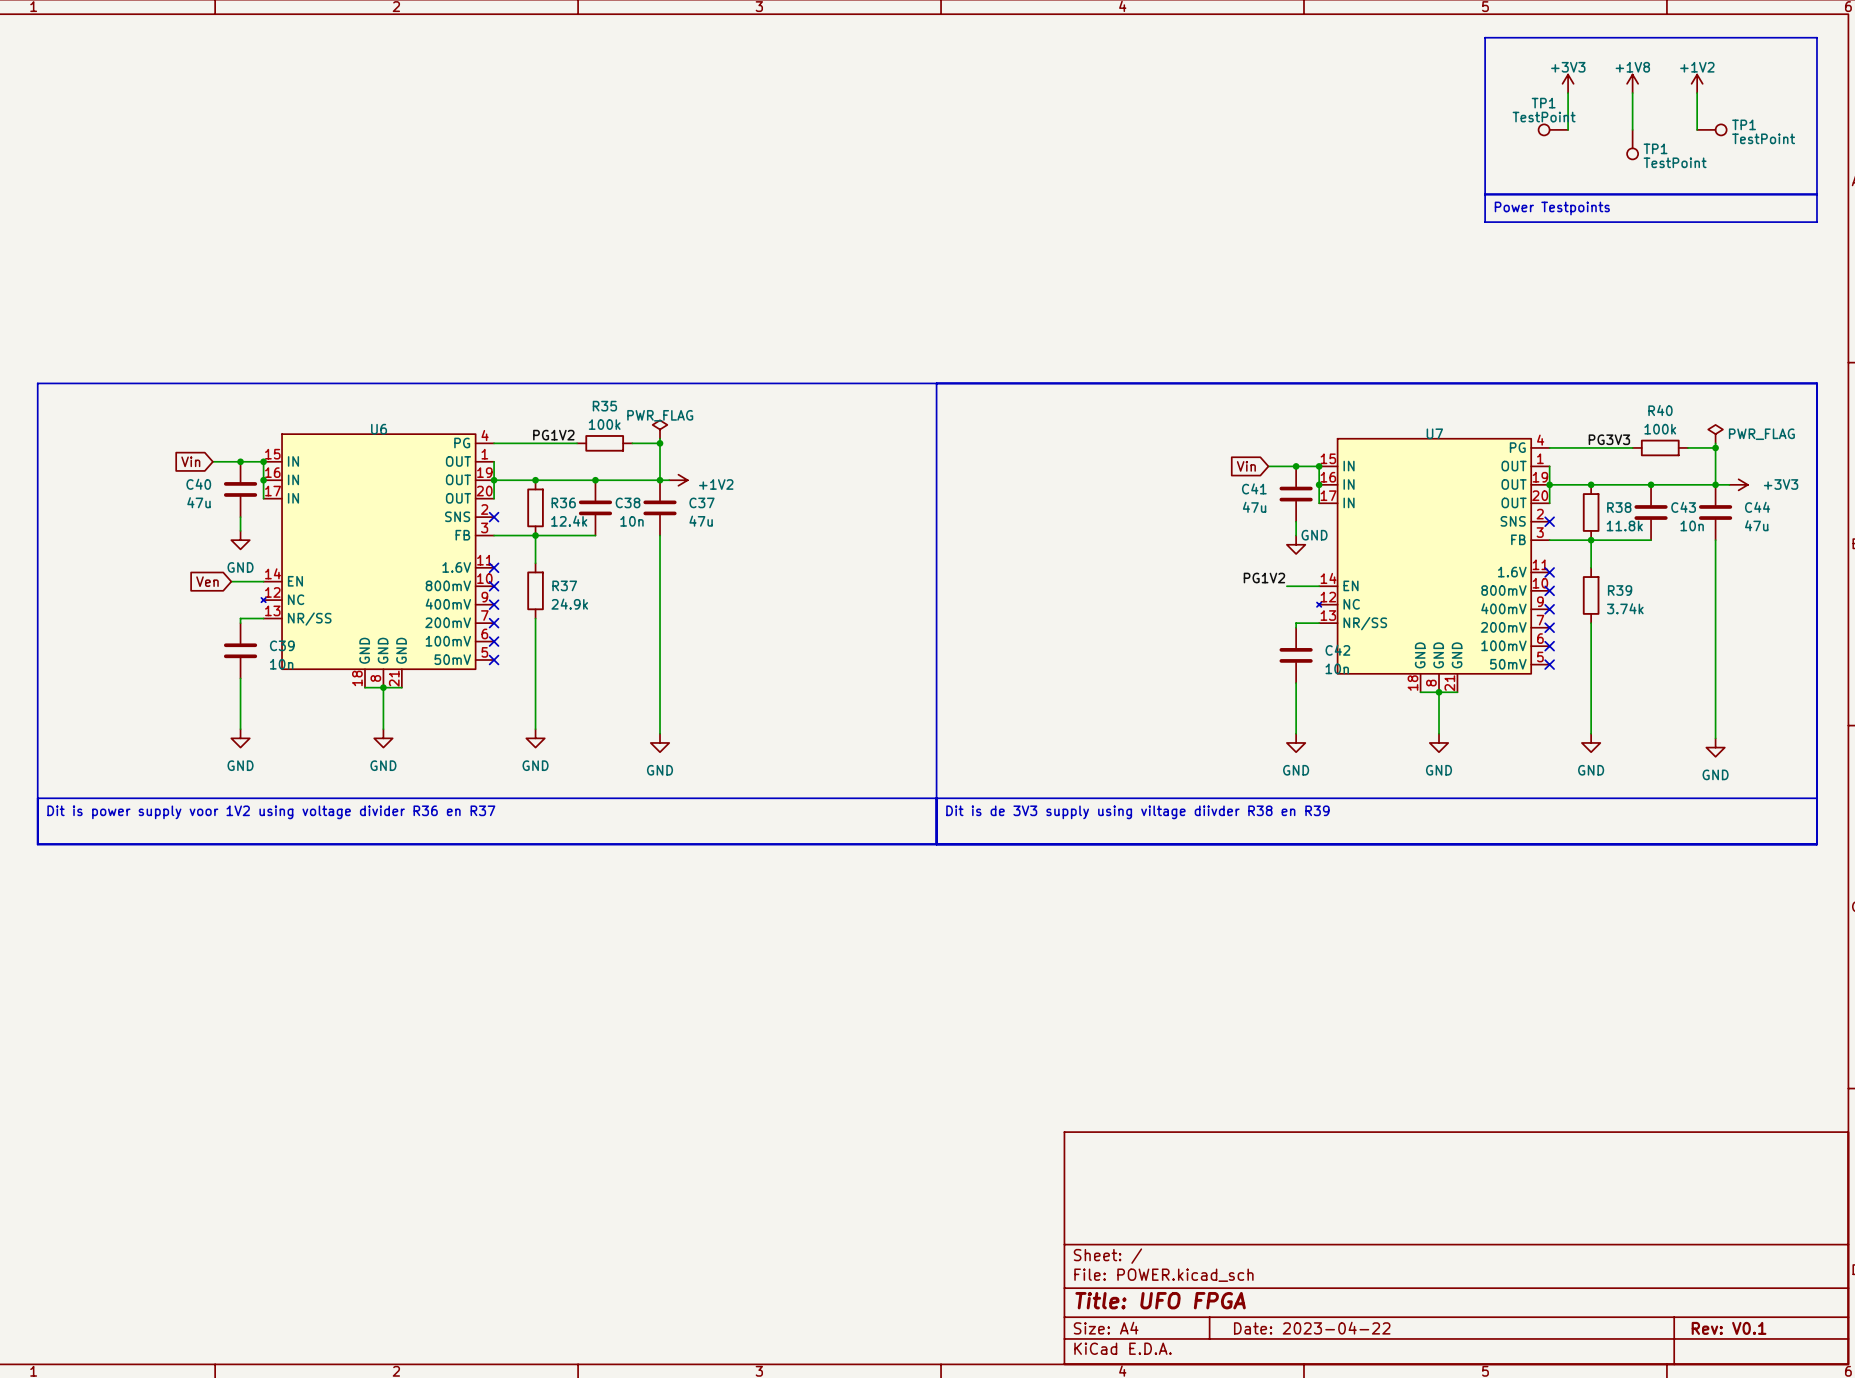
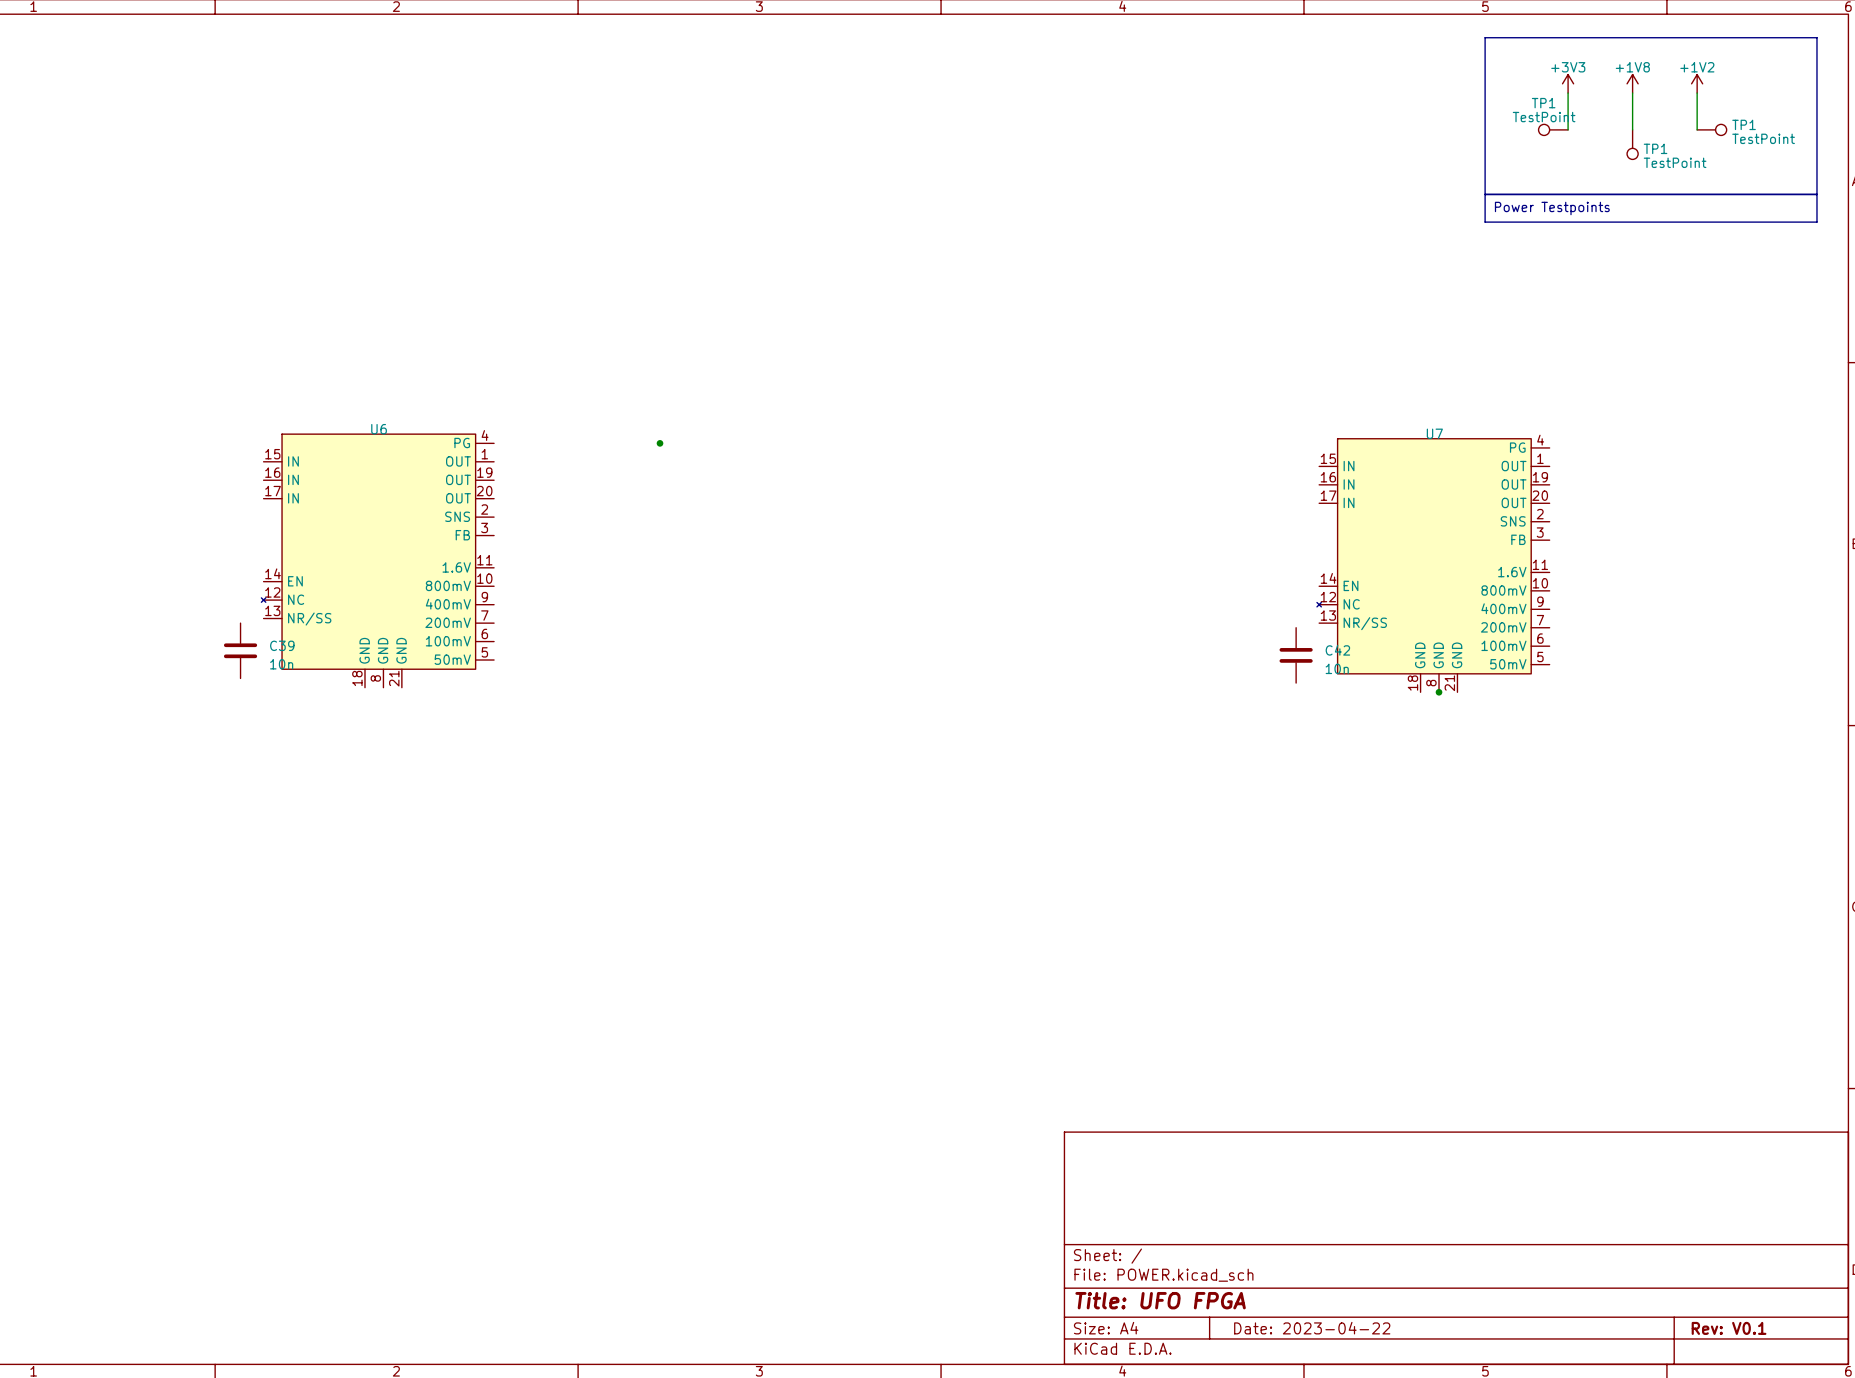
line: (37, 383) (1816, 383) (1816, 844) (37, 844) (37, 383) -> none
line: (936, 383) (936, 844) -> none
power symbol: PWR_FLAG (660, 429) -> none
power symbol: PWR_FLAG (1715, 434) -> none
label: PG1V2 (553, 435) -> none
wire: (660, 438) (660, 480) -> none
label: PG3V3 (1609, 439) -> none
wire: (494, 443) (577, 443) -> none
R35: 100k (604, 443) -> none
wire: (632, 443) (660, 443) -> none
wire: (1715, 443) (1715, 484) -> none
wire: (1549, 447) (1632, 447) -> none
R40: 100k (1660, 447) -> none
wire: (1687, 447) (1715, 447) -> none
junction: (1715, 447) -> none
global label: Vin (190, 461) -> none
wire: (212, 461) (263, 461) (263, 498) -> none
junction: (240, 461) -> none
junction: (263, 461) -> none
wire: (494, 461) (494, 498) -> none
global label: Vin (1246, 466) -> none
wire: (1268, 466) (1319, 466) (1319, 503) -> none
junction: (1296, 466) -> none
junction: (1319, 466) -> none
wire: (1549, 466) (1549, 503) -> none
junction: (263, 480) -> none
wire: (494, 480) (669, 480) -> none
junction: (494, 480) -> none
junction: (535, 480) -> none
junction: (595, 480) -> none
junction: (660, 480) -> none
power symbol: +1V2 (678, 480) -> none
junction: (1319, 484) -> none
wire: (1549, 484) (1729, 484) -> none
junction: (1549, 484) -> none
junction: (1591, 484) -> none
junction: (1651, 484) -> none
junction: (1715, 484) -> none
power symbol: +3V3 (1738, 484) -> none
C40: 47u (240, 489) -> none
C41: 47u (1296, 494) -> none
R36: 12.4k (535, 507) -> none
C38: 10n (595, 507) -> none
C37: 47u (660, 507) -> none
R38: 11.8k (1591, 512) -> none
C43: 10n (1651, 512) -> none
C44: 47u (1715, 512) -> none
wire: (240, 517) (240, 530) -> none
no-connect mark: (494, 517) -> none
wire: (1296, 521) (1296, 535) -> none
no-connect mark: (1549, 521) -> none
wire: (494, 535) (595, 535) -> none
wire: (535, 535) (535, 563) -> none
junction: (535, 535) -> none
wire: (660, 535) (660, 733) -> none
power symbol: GND (240, 540) -> none
wire: (1549, 540) (1651, 540) -> none
wire: (1591, 540) (1591, 567) -> none
junction: (1591, 540) -> none
wire: (1715, 540) (1715, 738) -> none
power symbol: GND (1296, 544) -> none
no-connect mark: (494, 567) -> none
no-connect mark: (1549, 572) -> none
label: PG1V2 (1264, 578) -> none
global label: Ven (207, 581) -> none
wire: (231, 581) (263, 581) -> none
no-connect mark: (494, 586) -> none
wire: (1286, 586) (1319, 586) -> none
R37: 24.9k (535, 590) -> none
no-connect mark: (1549, 590) -> none
R39: 3.74k (1591, 595) -> none
no-connect mark: (494, 604) -> none
no-connect mark: (1549, 609) -> none
wire: (263, 618) (240, 618) (240, 623) -> none
wire: (535, 618) (535, 729) -> none
no-connect mark: (494, 623) -> none
wire: (1319, 623) (1296, 623) (1296, 627) -> none
wire: (1591, 623) (1591, 733) -> none
no-connect mark: (1549, 627) -> none
no-connect mark: (494, 641) -> none
no-connect mark: (1549, 646) -> none
no-connect mark: (494, 660) -> none
no-connect mark: (1549, 664) -> none
wire: (240, 678) (240, 729) -> none
wire: (1296, 683) (1296, 733) -> none
wire: (364, 687) (401, 687) -> none
wire: (383, 687) (383, 729) -> none
junction: (383, 687) -> none
wire: (1420, 692) (1457, 692) -> none
wire: (1439, 692) (1439, 733) -> none
power symbol: GND (240, 738) -> none
power symbol: GND (383, 738) -> none
power symbol: GND (535, 738) -> none
power symbol: GND (660, 742) -> none
power symbol: GND (1296, 742) -> none
power symbol: GND (1439, 742) -> none
power symbol: GND (1591, 742) -> none
power symbol: GND (1715, 747) -> none
line: (37, 798) (1816, 798) -> none
text: Dit is power supply voor 1V2 using voltage divider R36 en R37 (271, 812) -> none
text: Dit is de 3V3 supply using viltage diivder R38 en R39 (1137, 812) -> none

